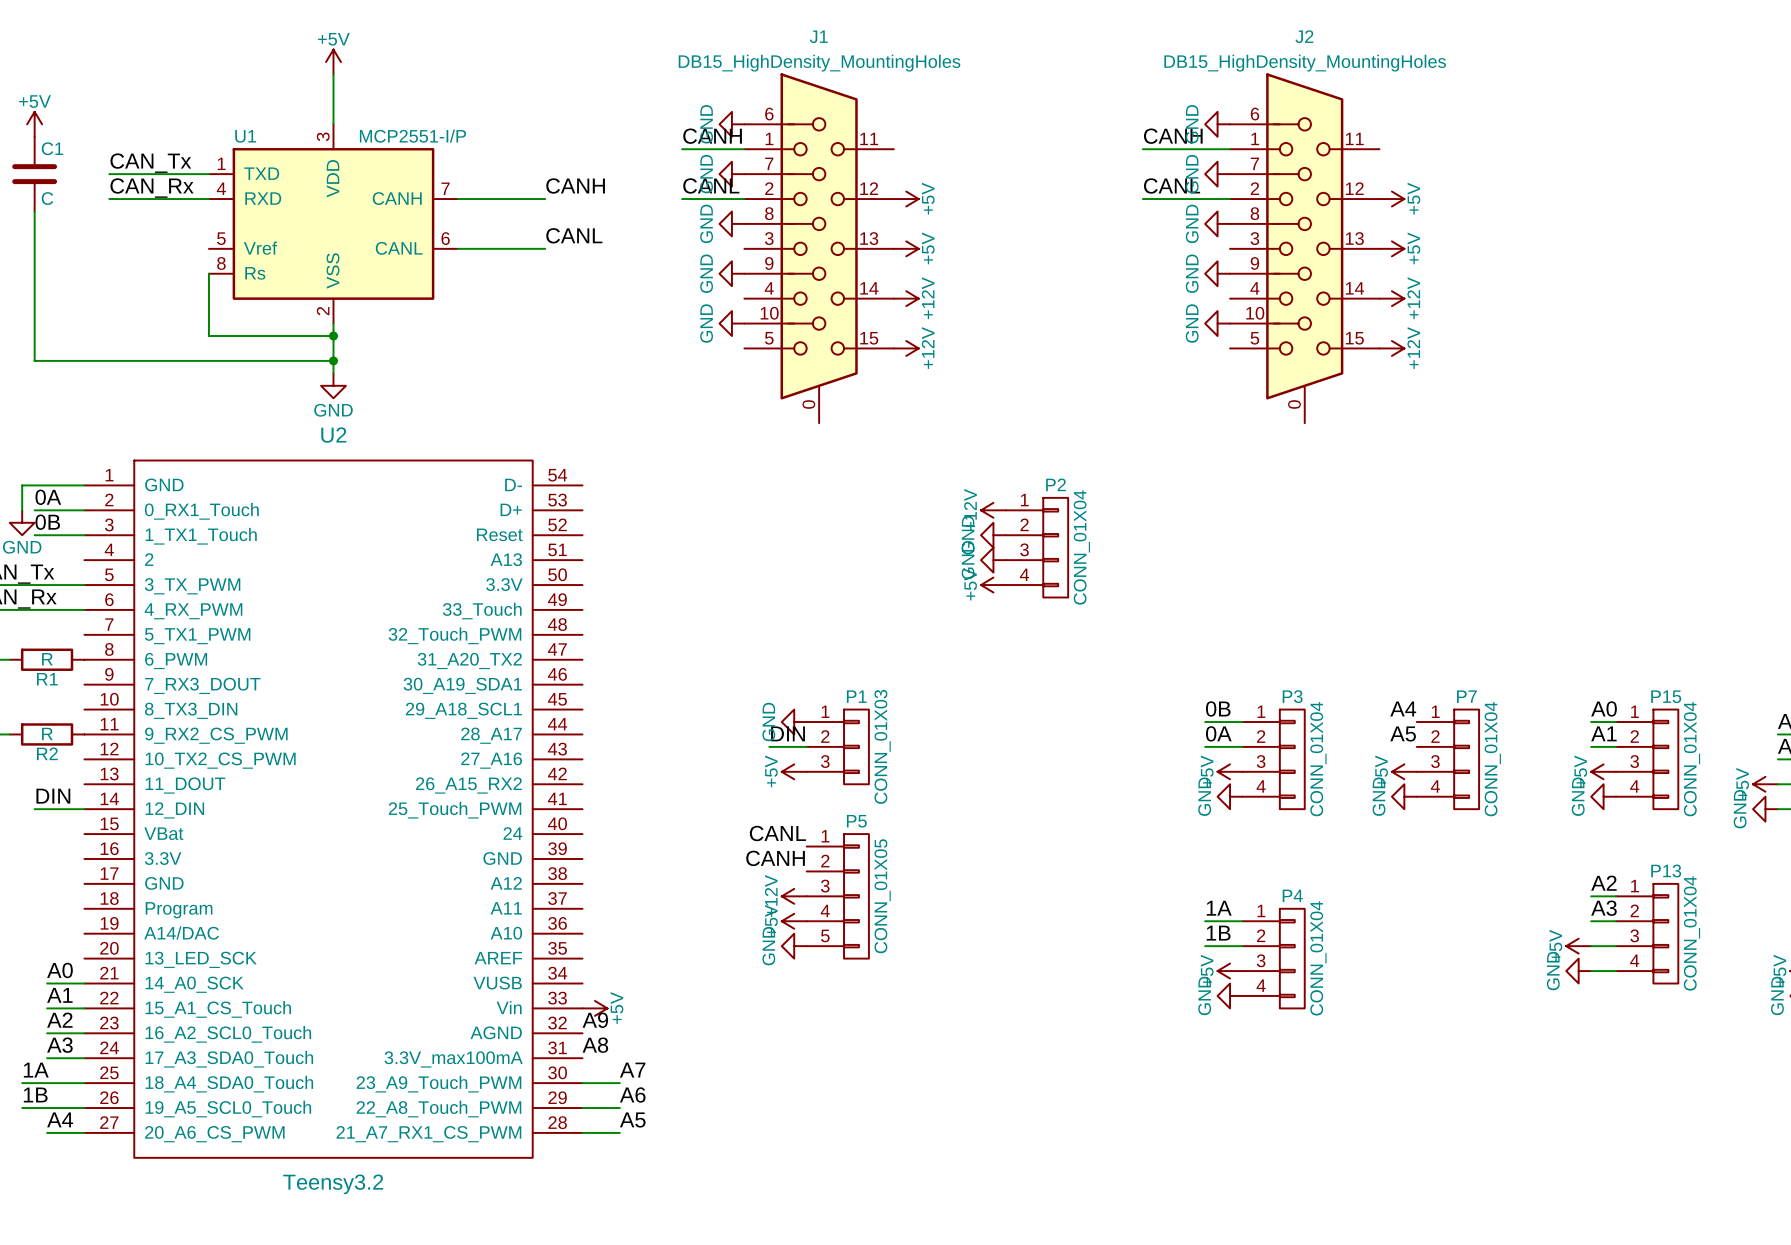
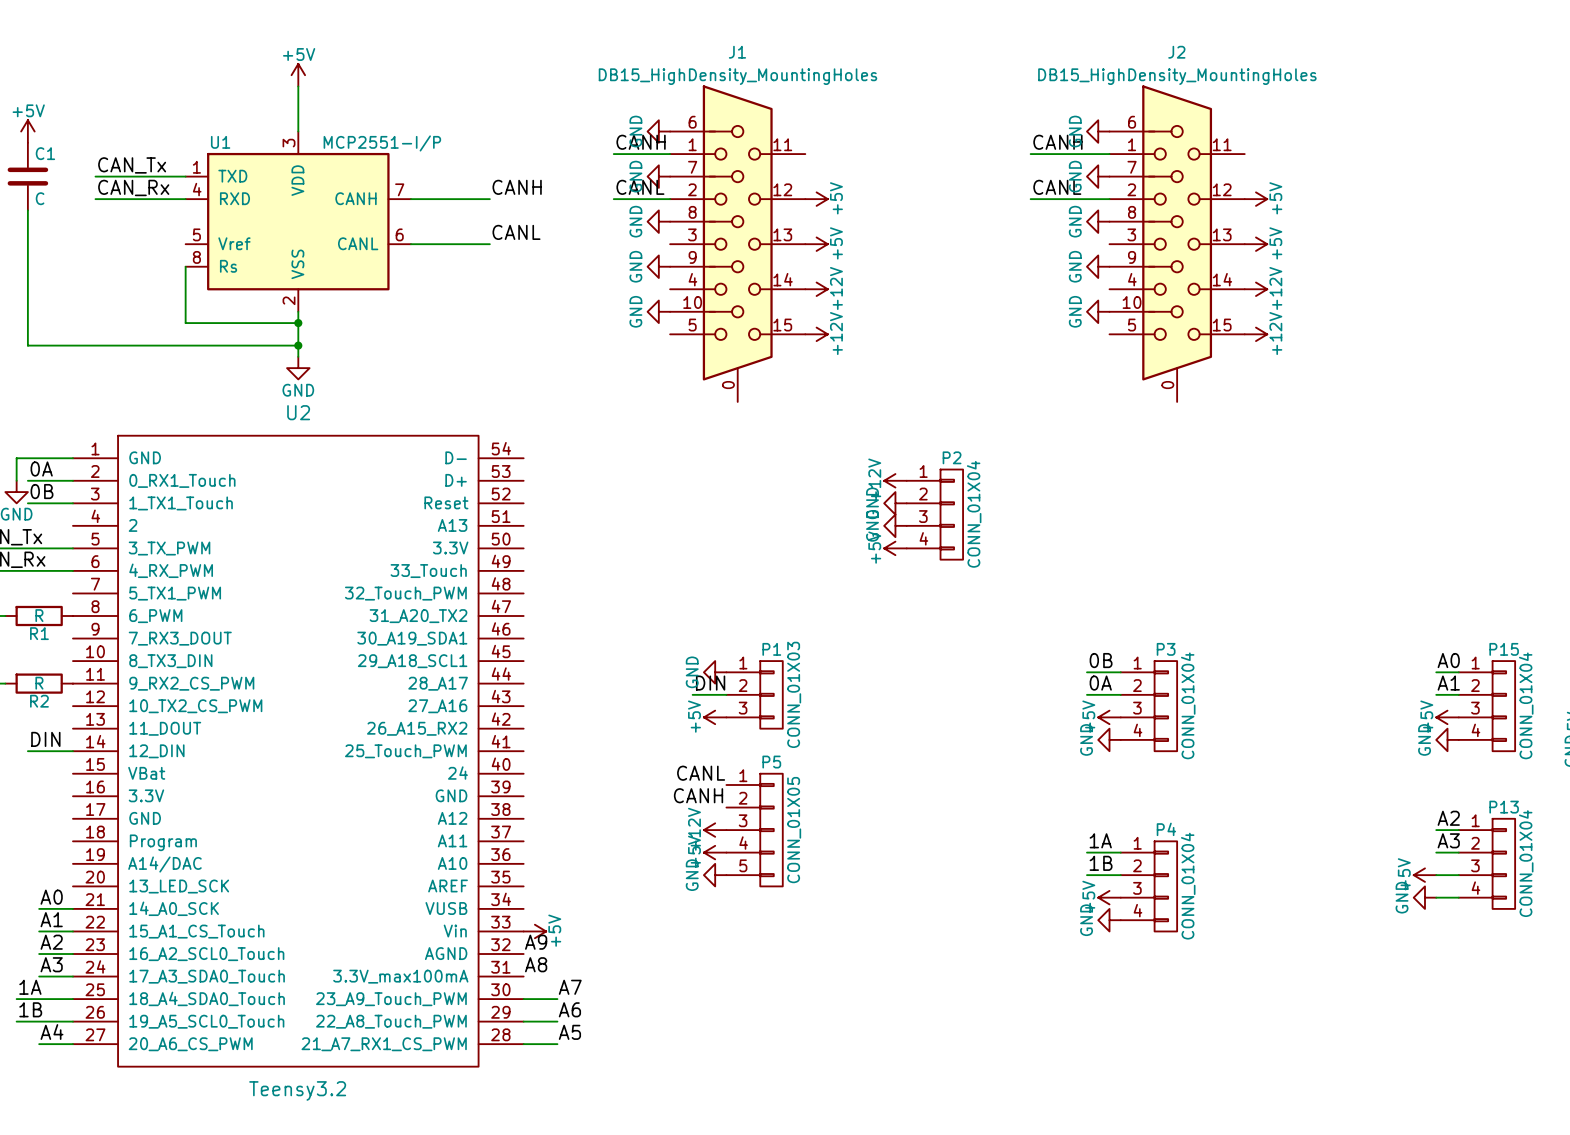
label: A4 (1403, 708) -> none
label: A5 (1403, 733) -> none
P7: CONN_01X04 (1447, 759) -> none
power symbol: +5V (1404, 771) -> none
power symbol: GND (1404, 796) -> none

